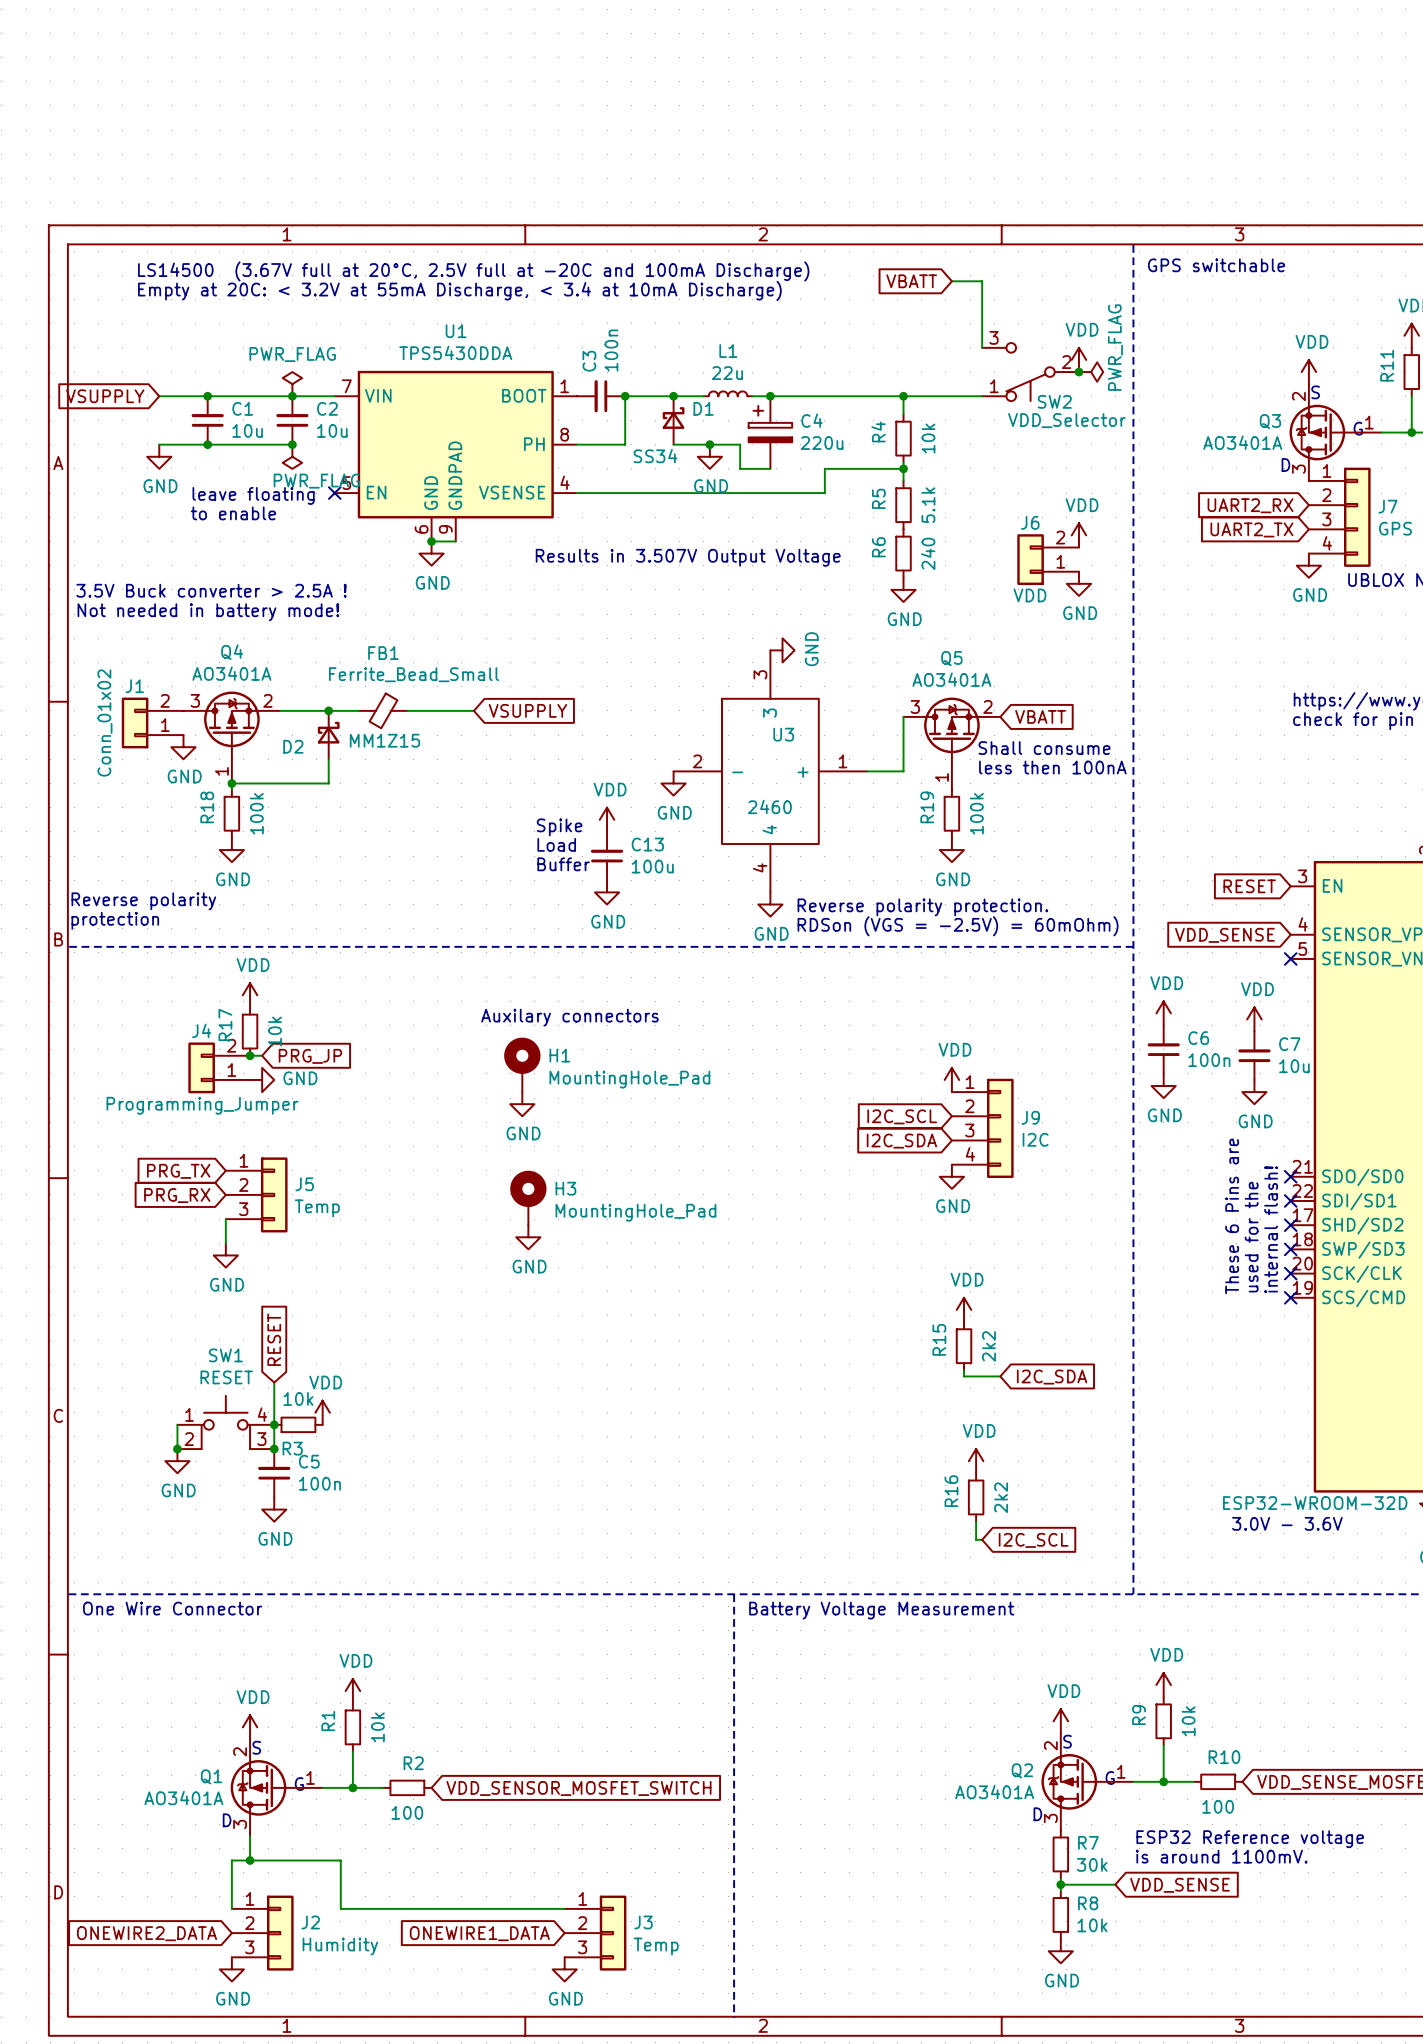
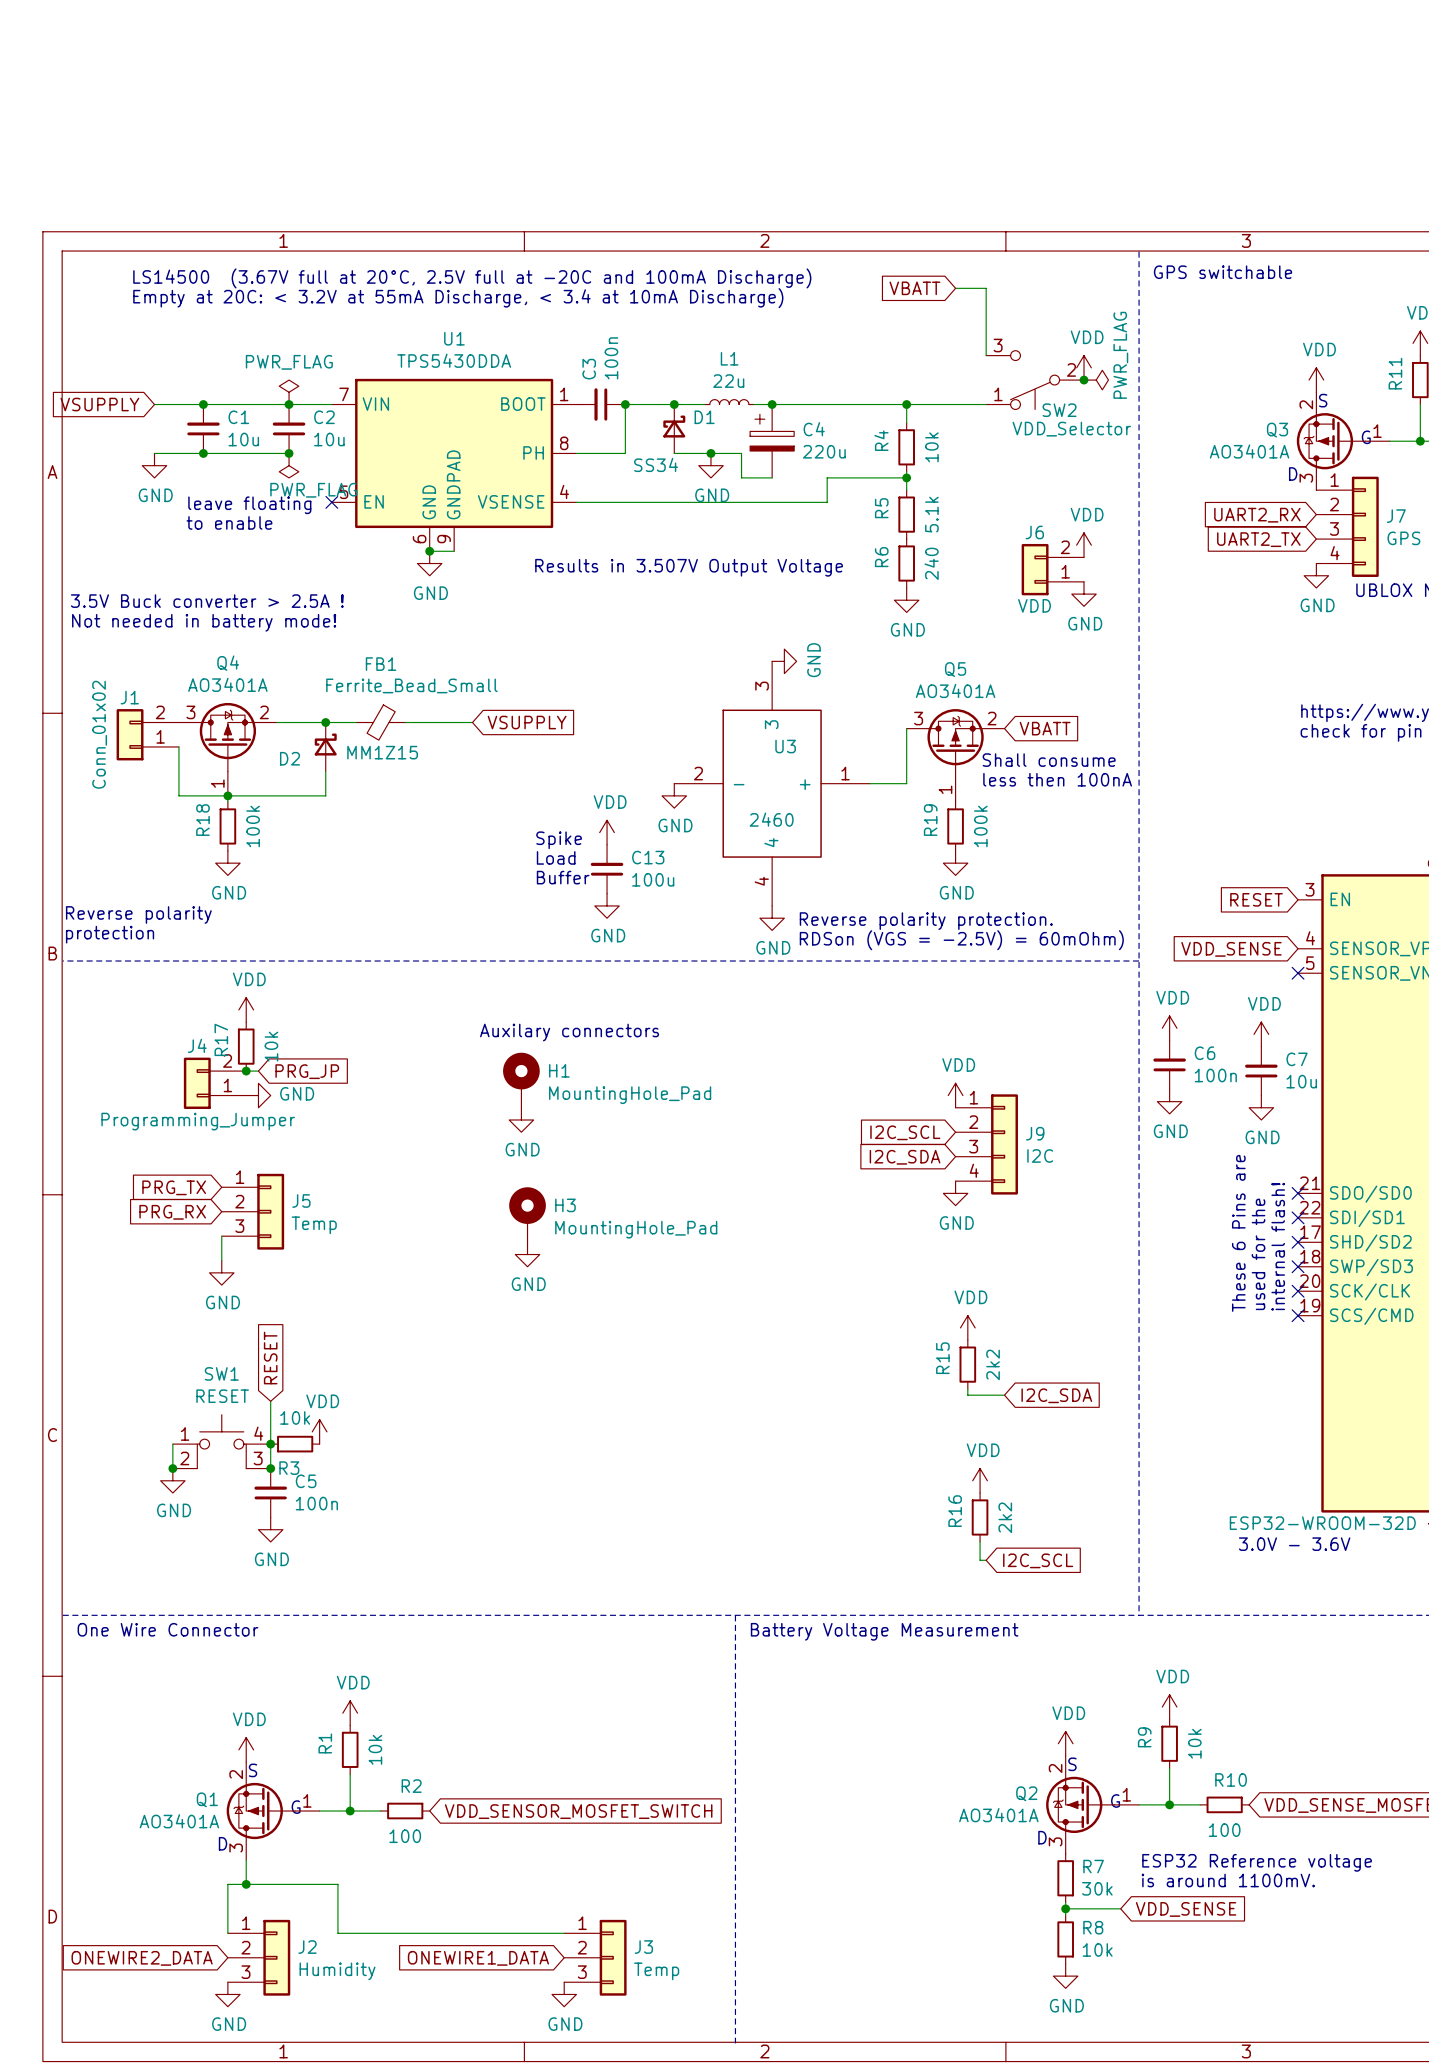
wire: none -> (178, 746) (178, 795) (227, 795)
power symbol: GND (183, 747) -> none

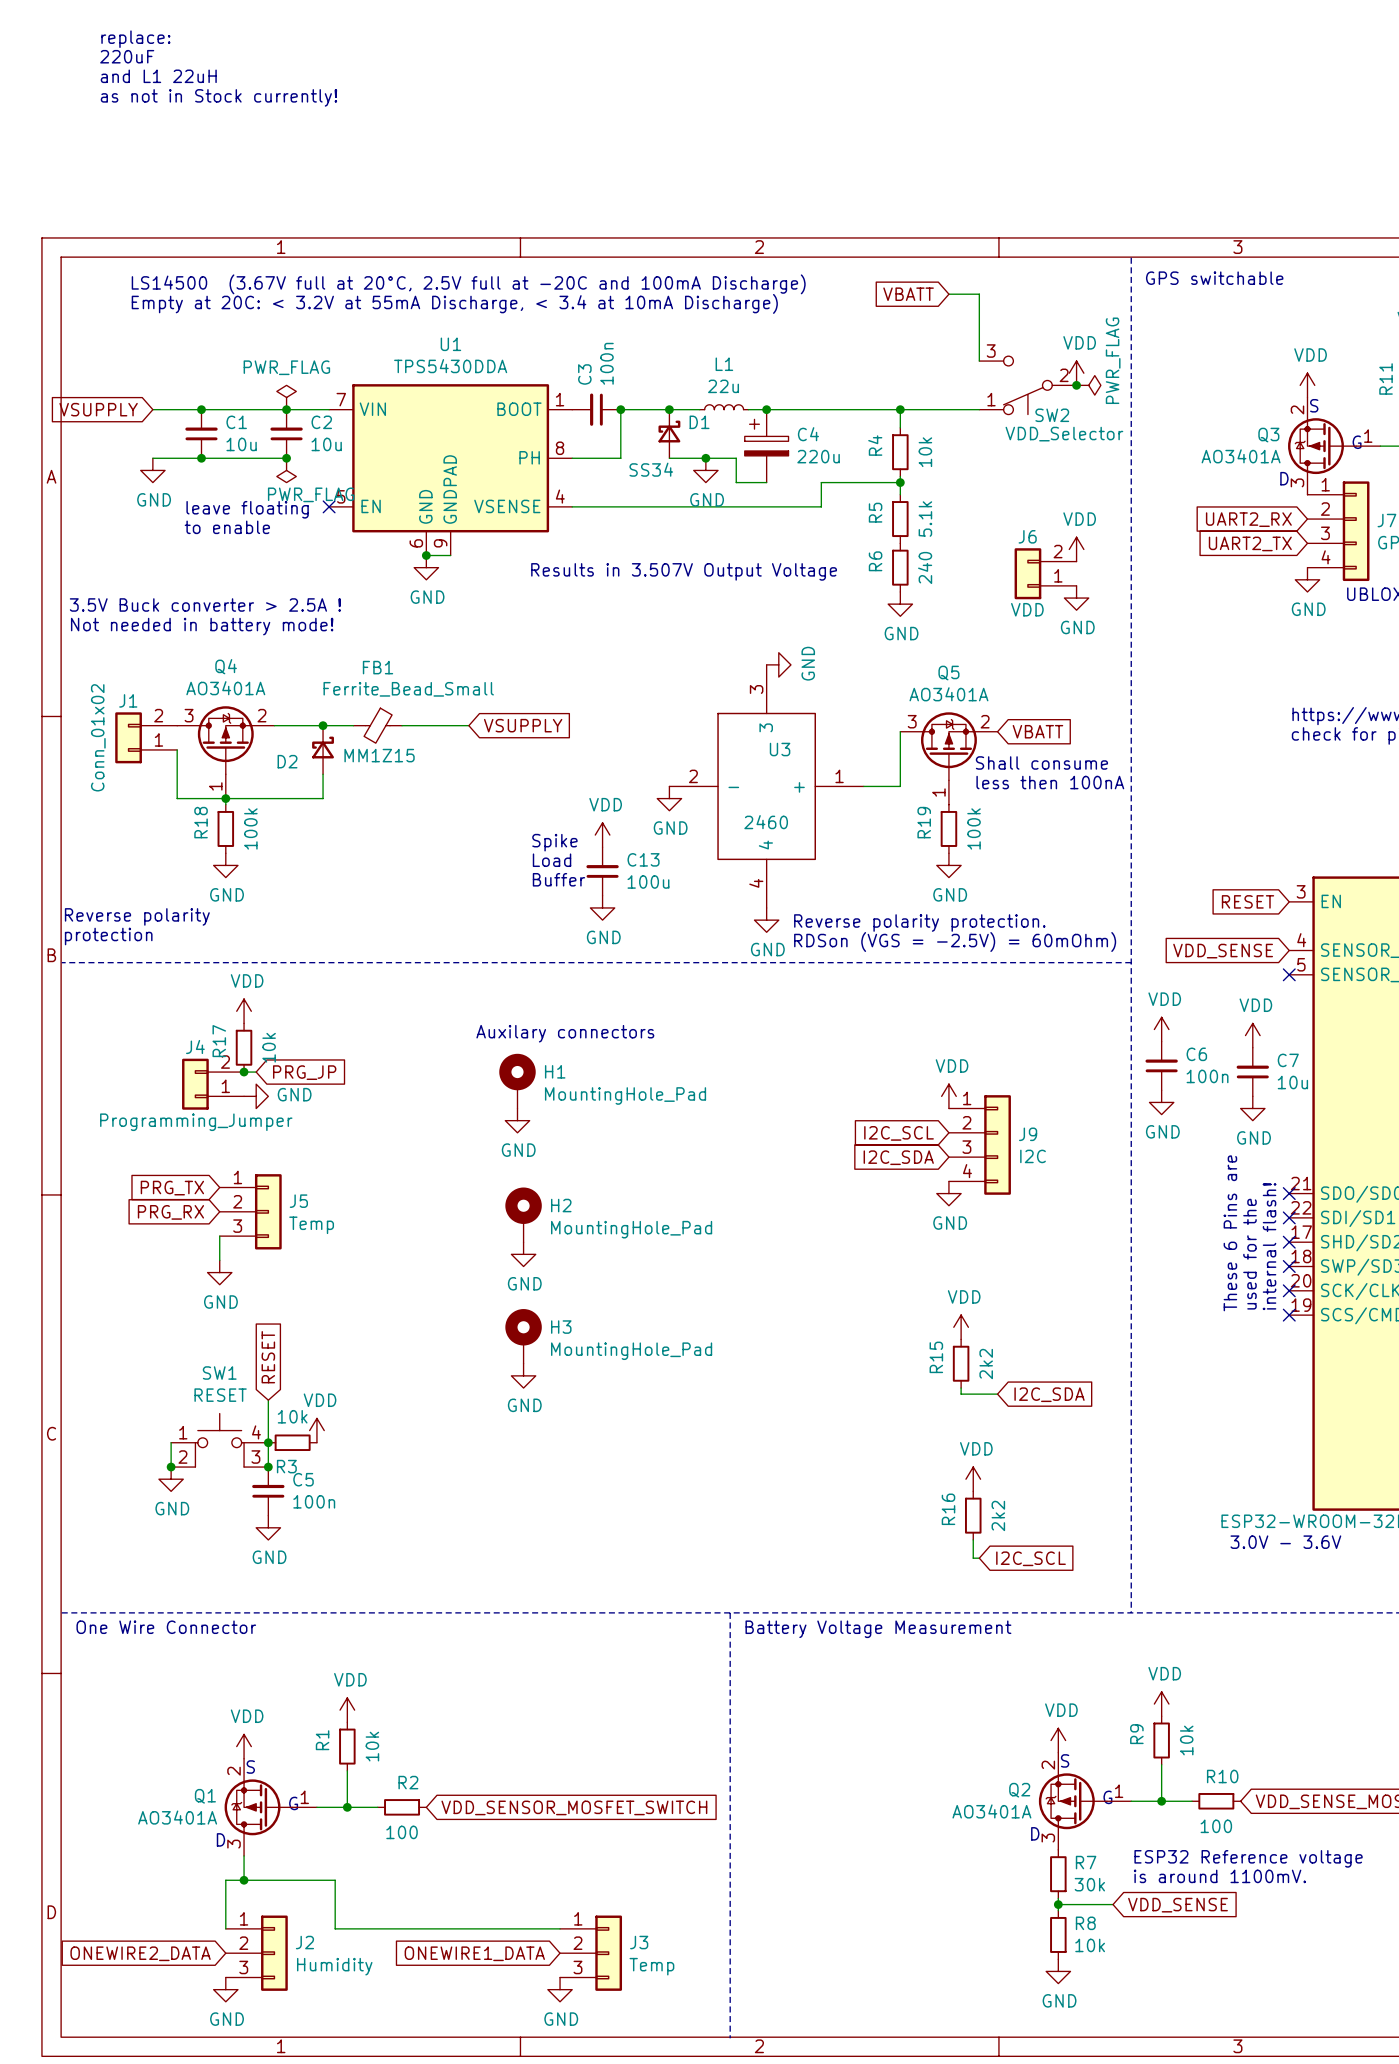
text: none -> replace: (135, 39)
text: none -> 220uF (127, 56)
text: none -> and L1 22uH (158, 76)
text: none -> as not in Stock currently! (218, 97)
H3 name: H3 (565, 1205) -> H2 (561, 1205)
H3: none -> MountingHole_Pad (523, 1336)
power symbol: none -> GND (523, 1375)

